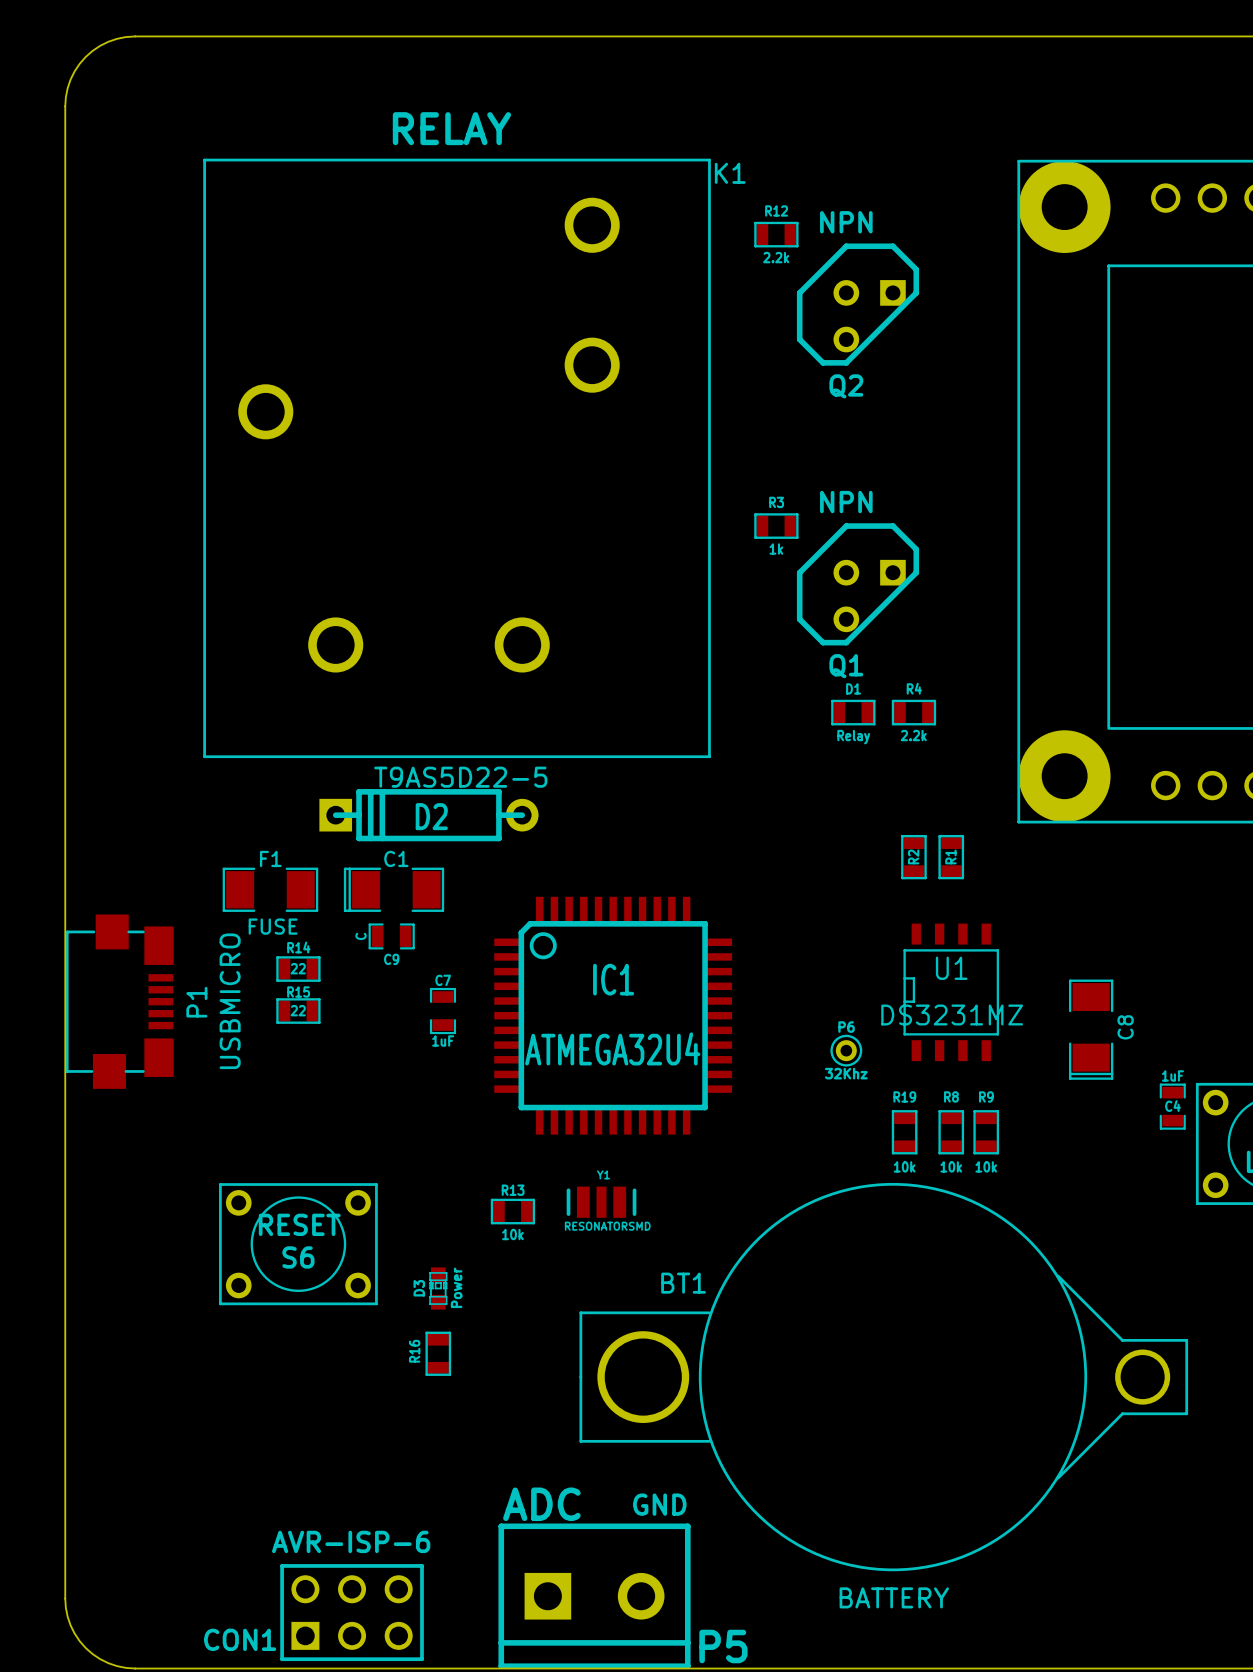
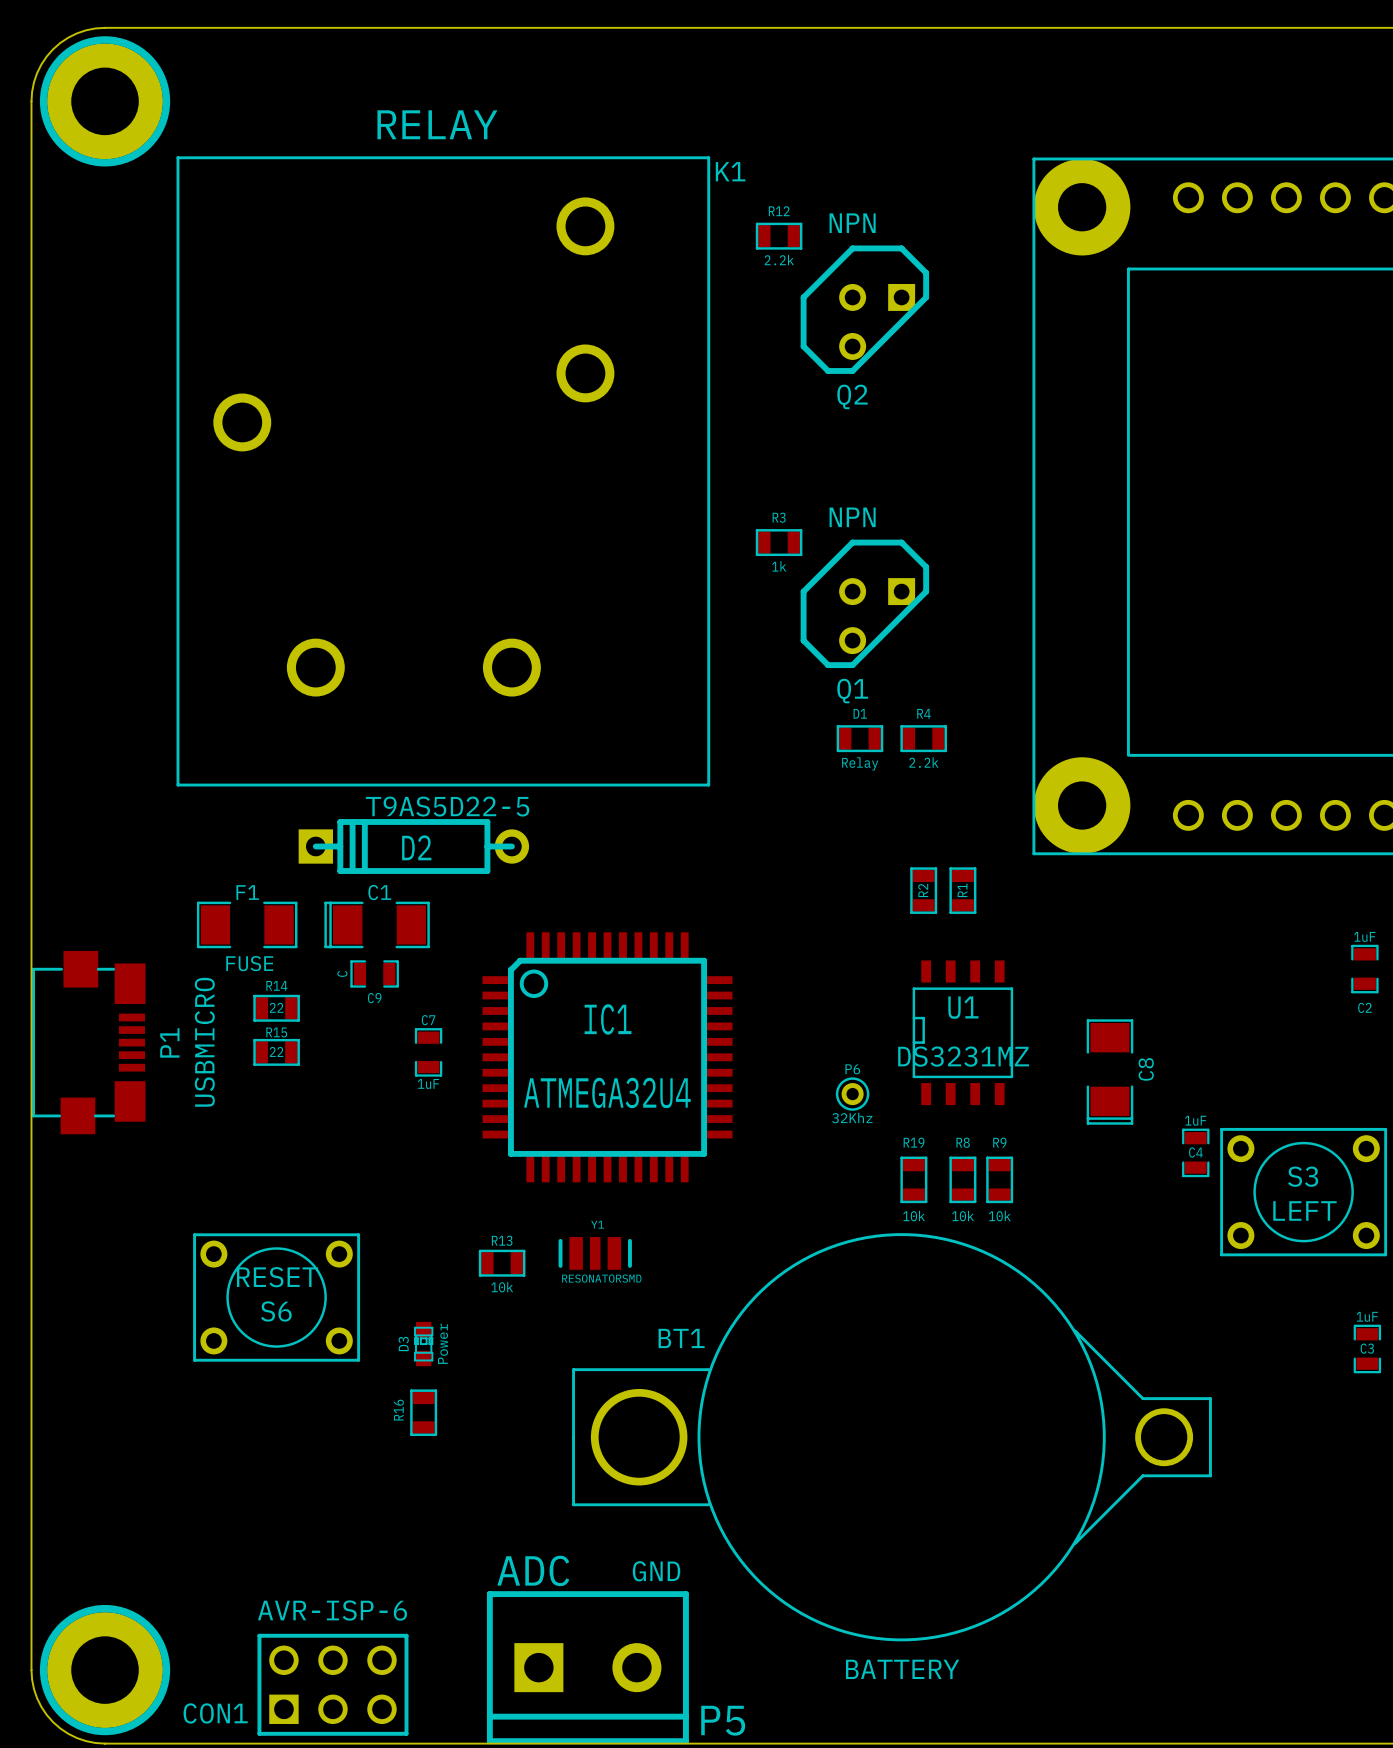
part: none -> (105, 101)
part: none -> (105, 1670)

